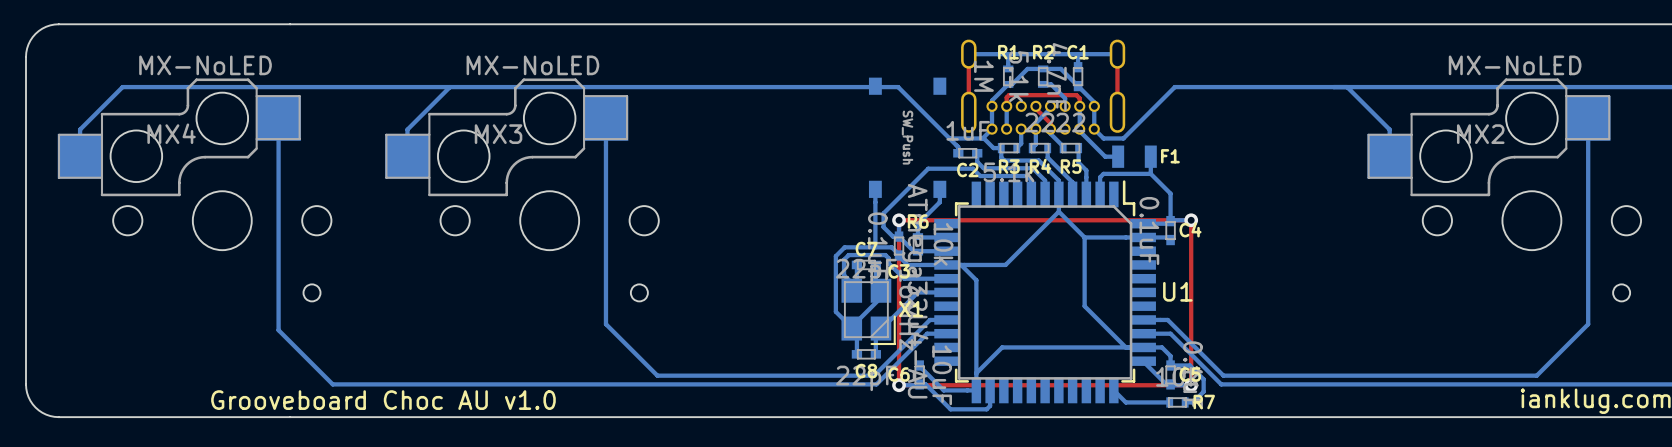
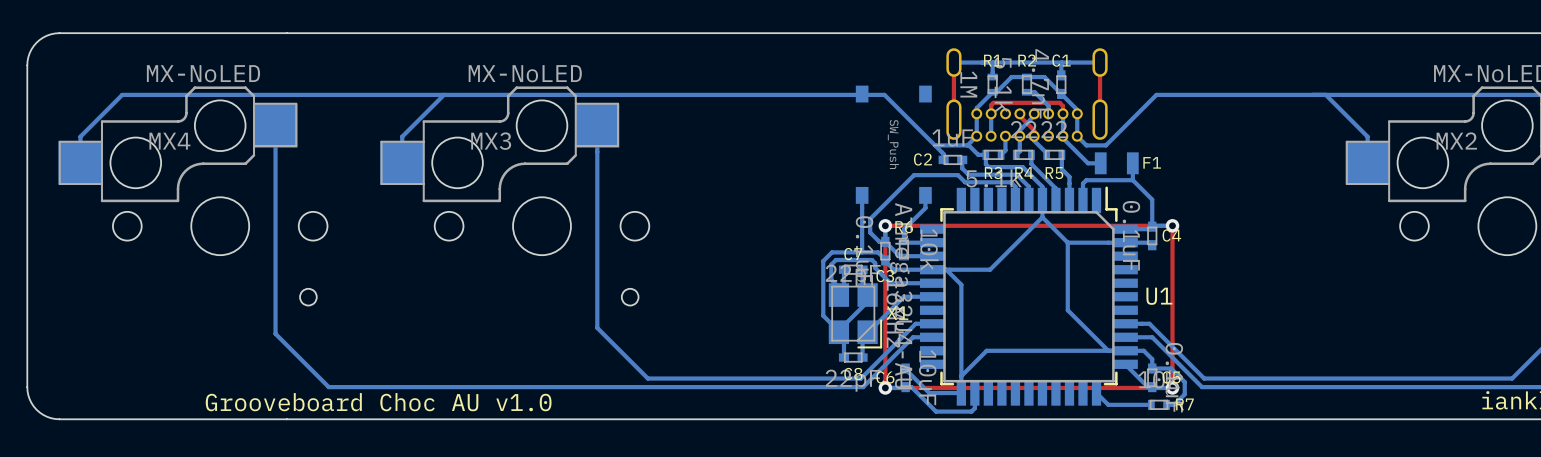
C2 name position: C2 (967, 169) -> C2 (923, 159)

